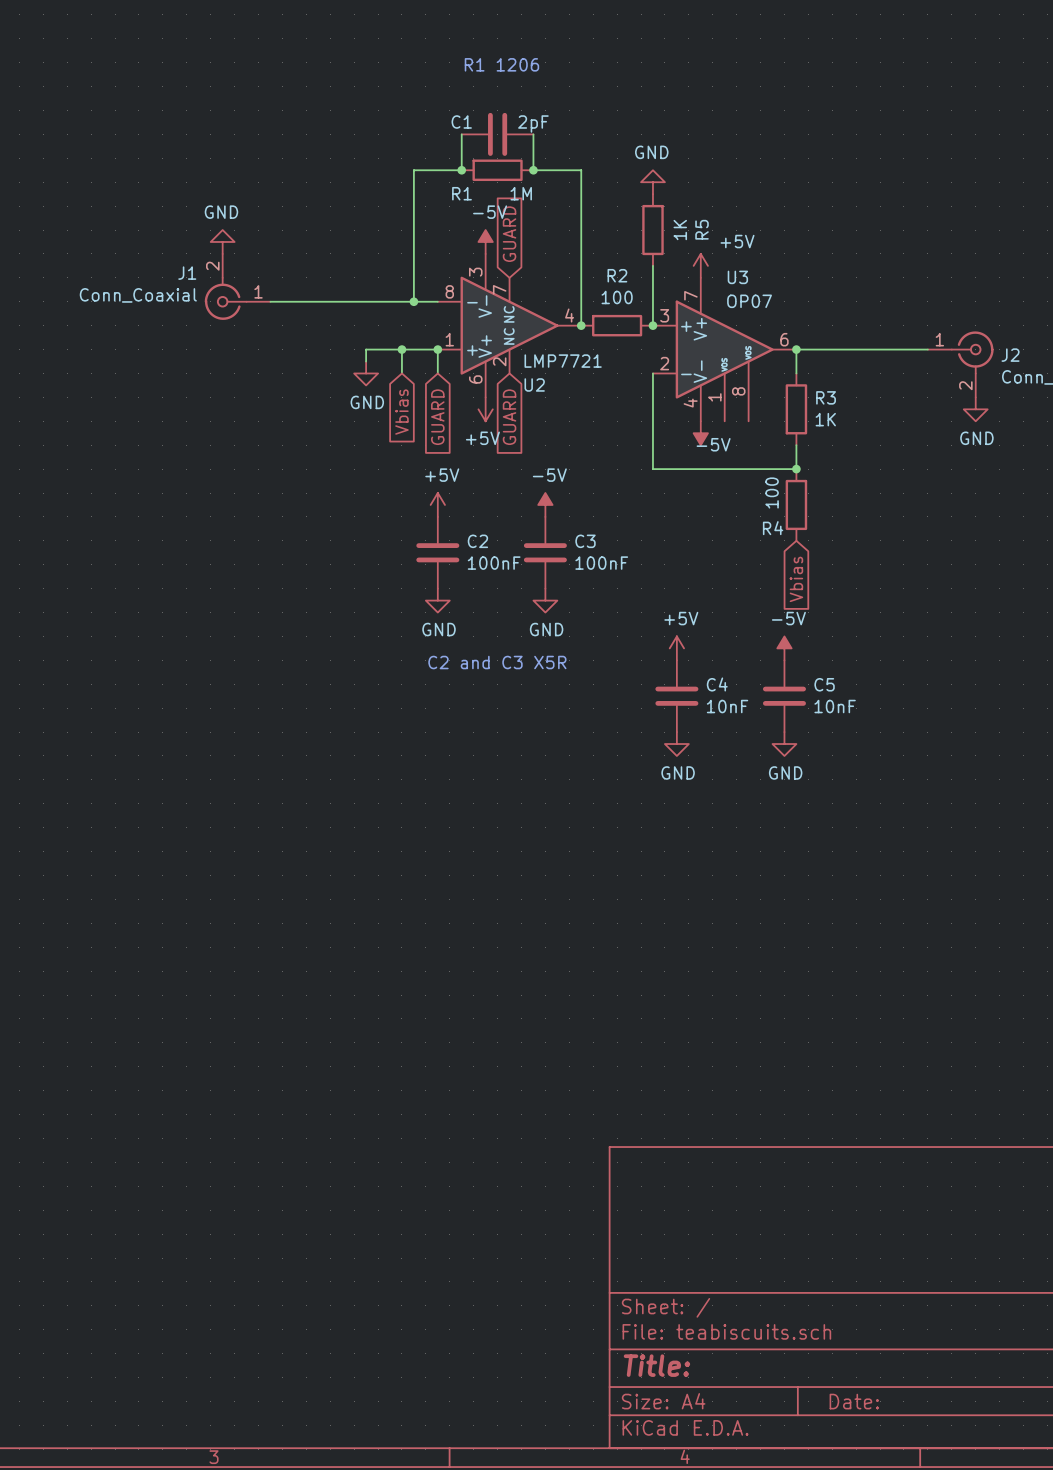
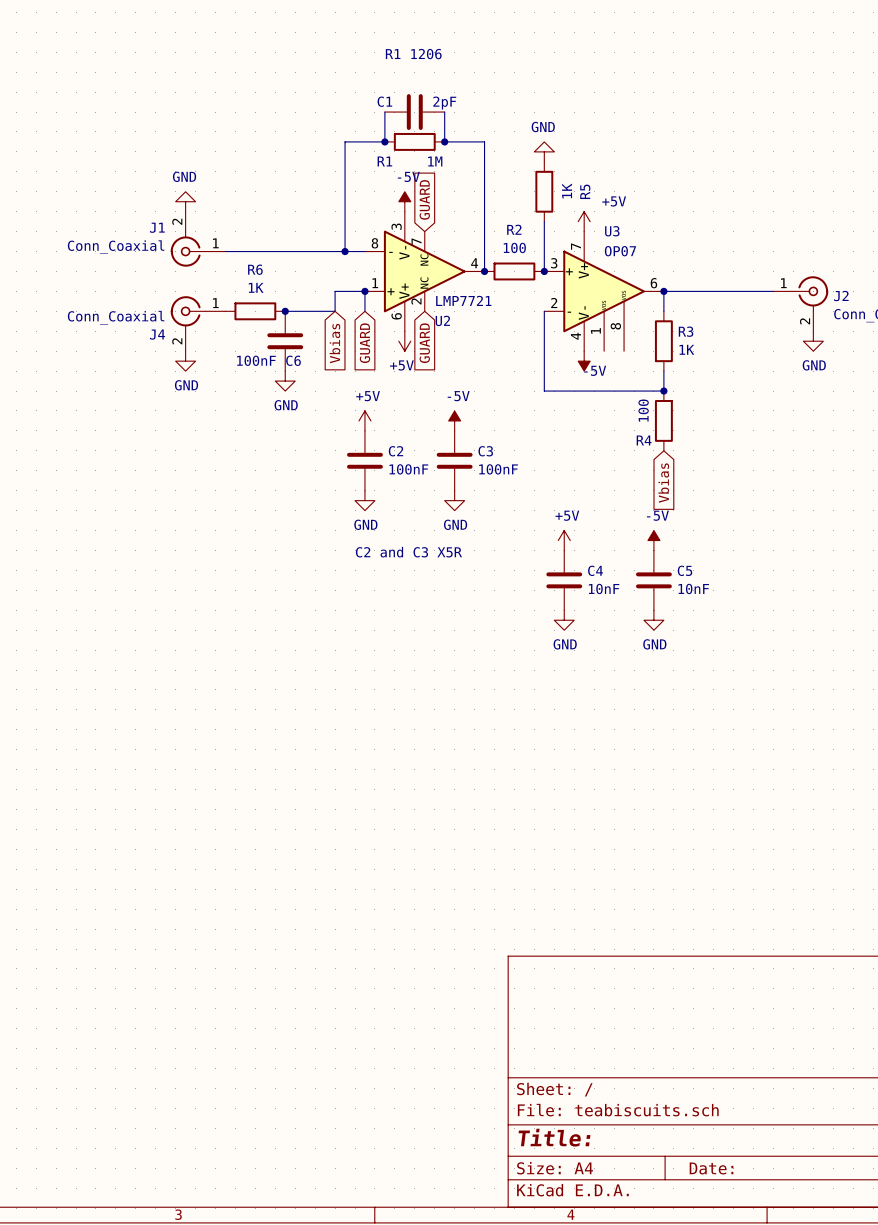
wire: (401, 349) (366, 349) (366, 361) -> none
junction: (401, 349) -> none
R6: none -> 1K (255, 311)
wire: none -> (285, 311) (335, 311)
junction: none -> (285, 311)
power symbol: GND (366, 373) -> none
J4: none -> Conn_Coaxial (198, 323)
C6: none -> 100nF (285, 341)
power symbol: none -> GND (185, 361)
power symbol: none -> GND (285, 381)

